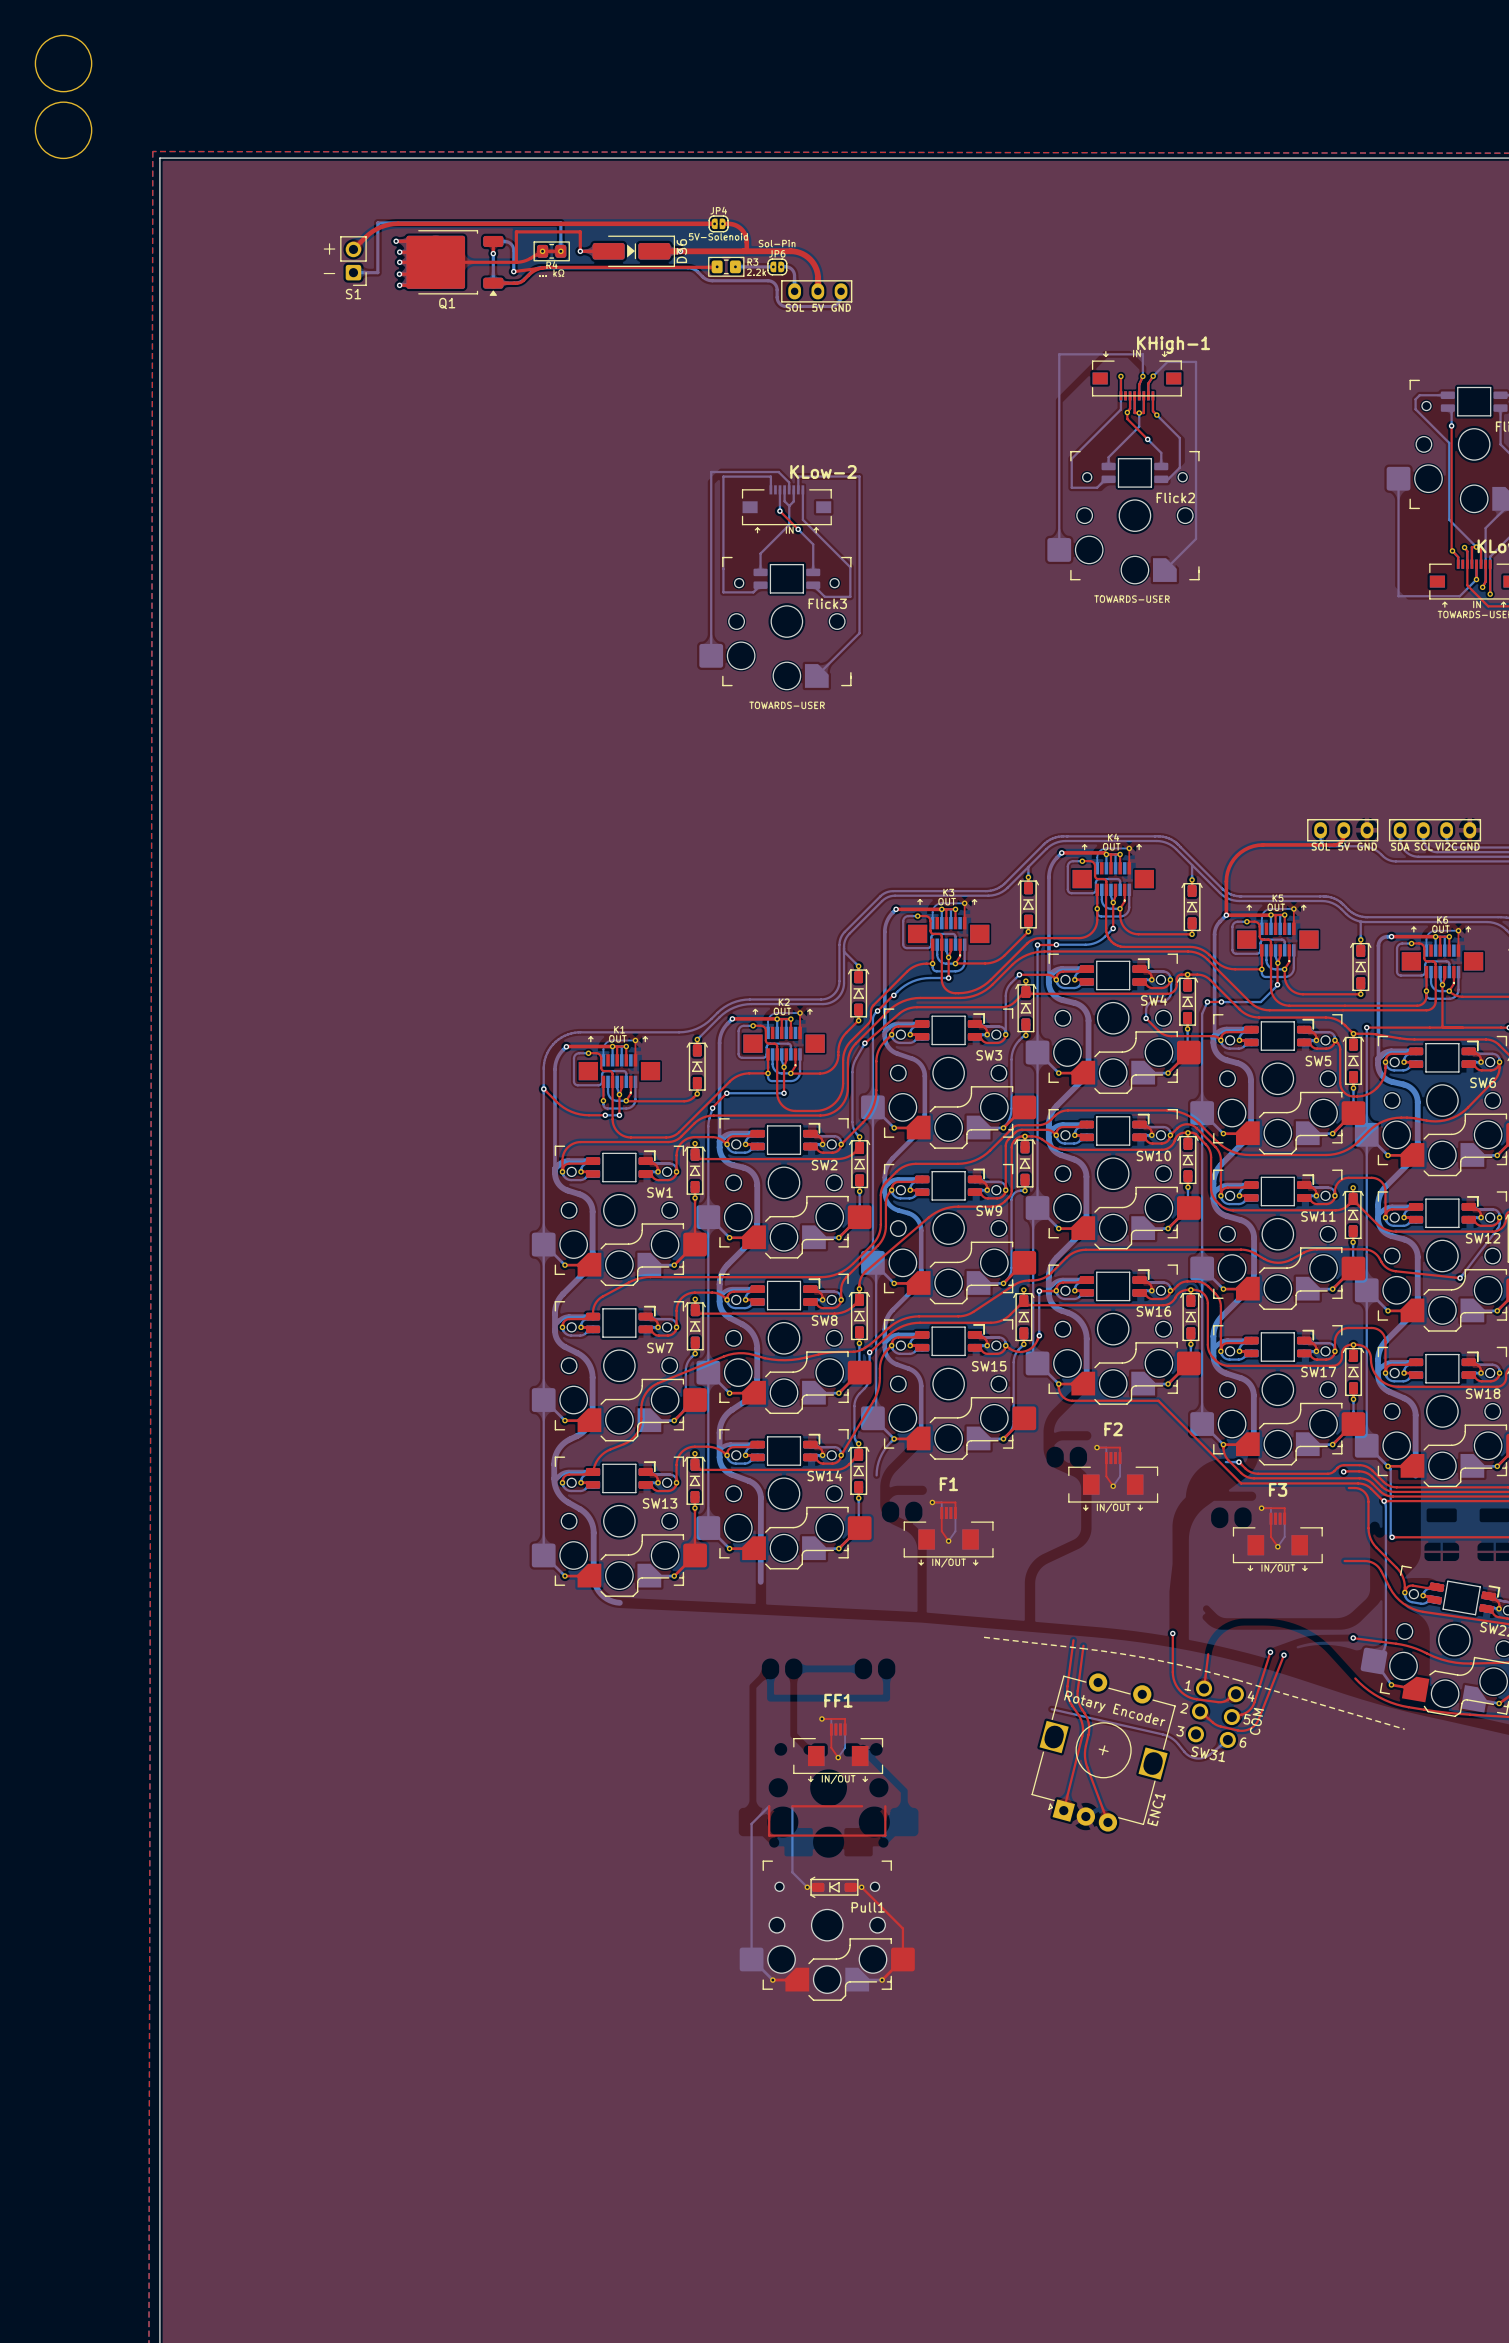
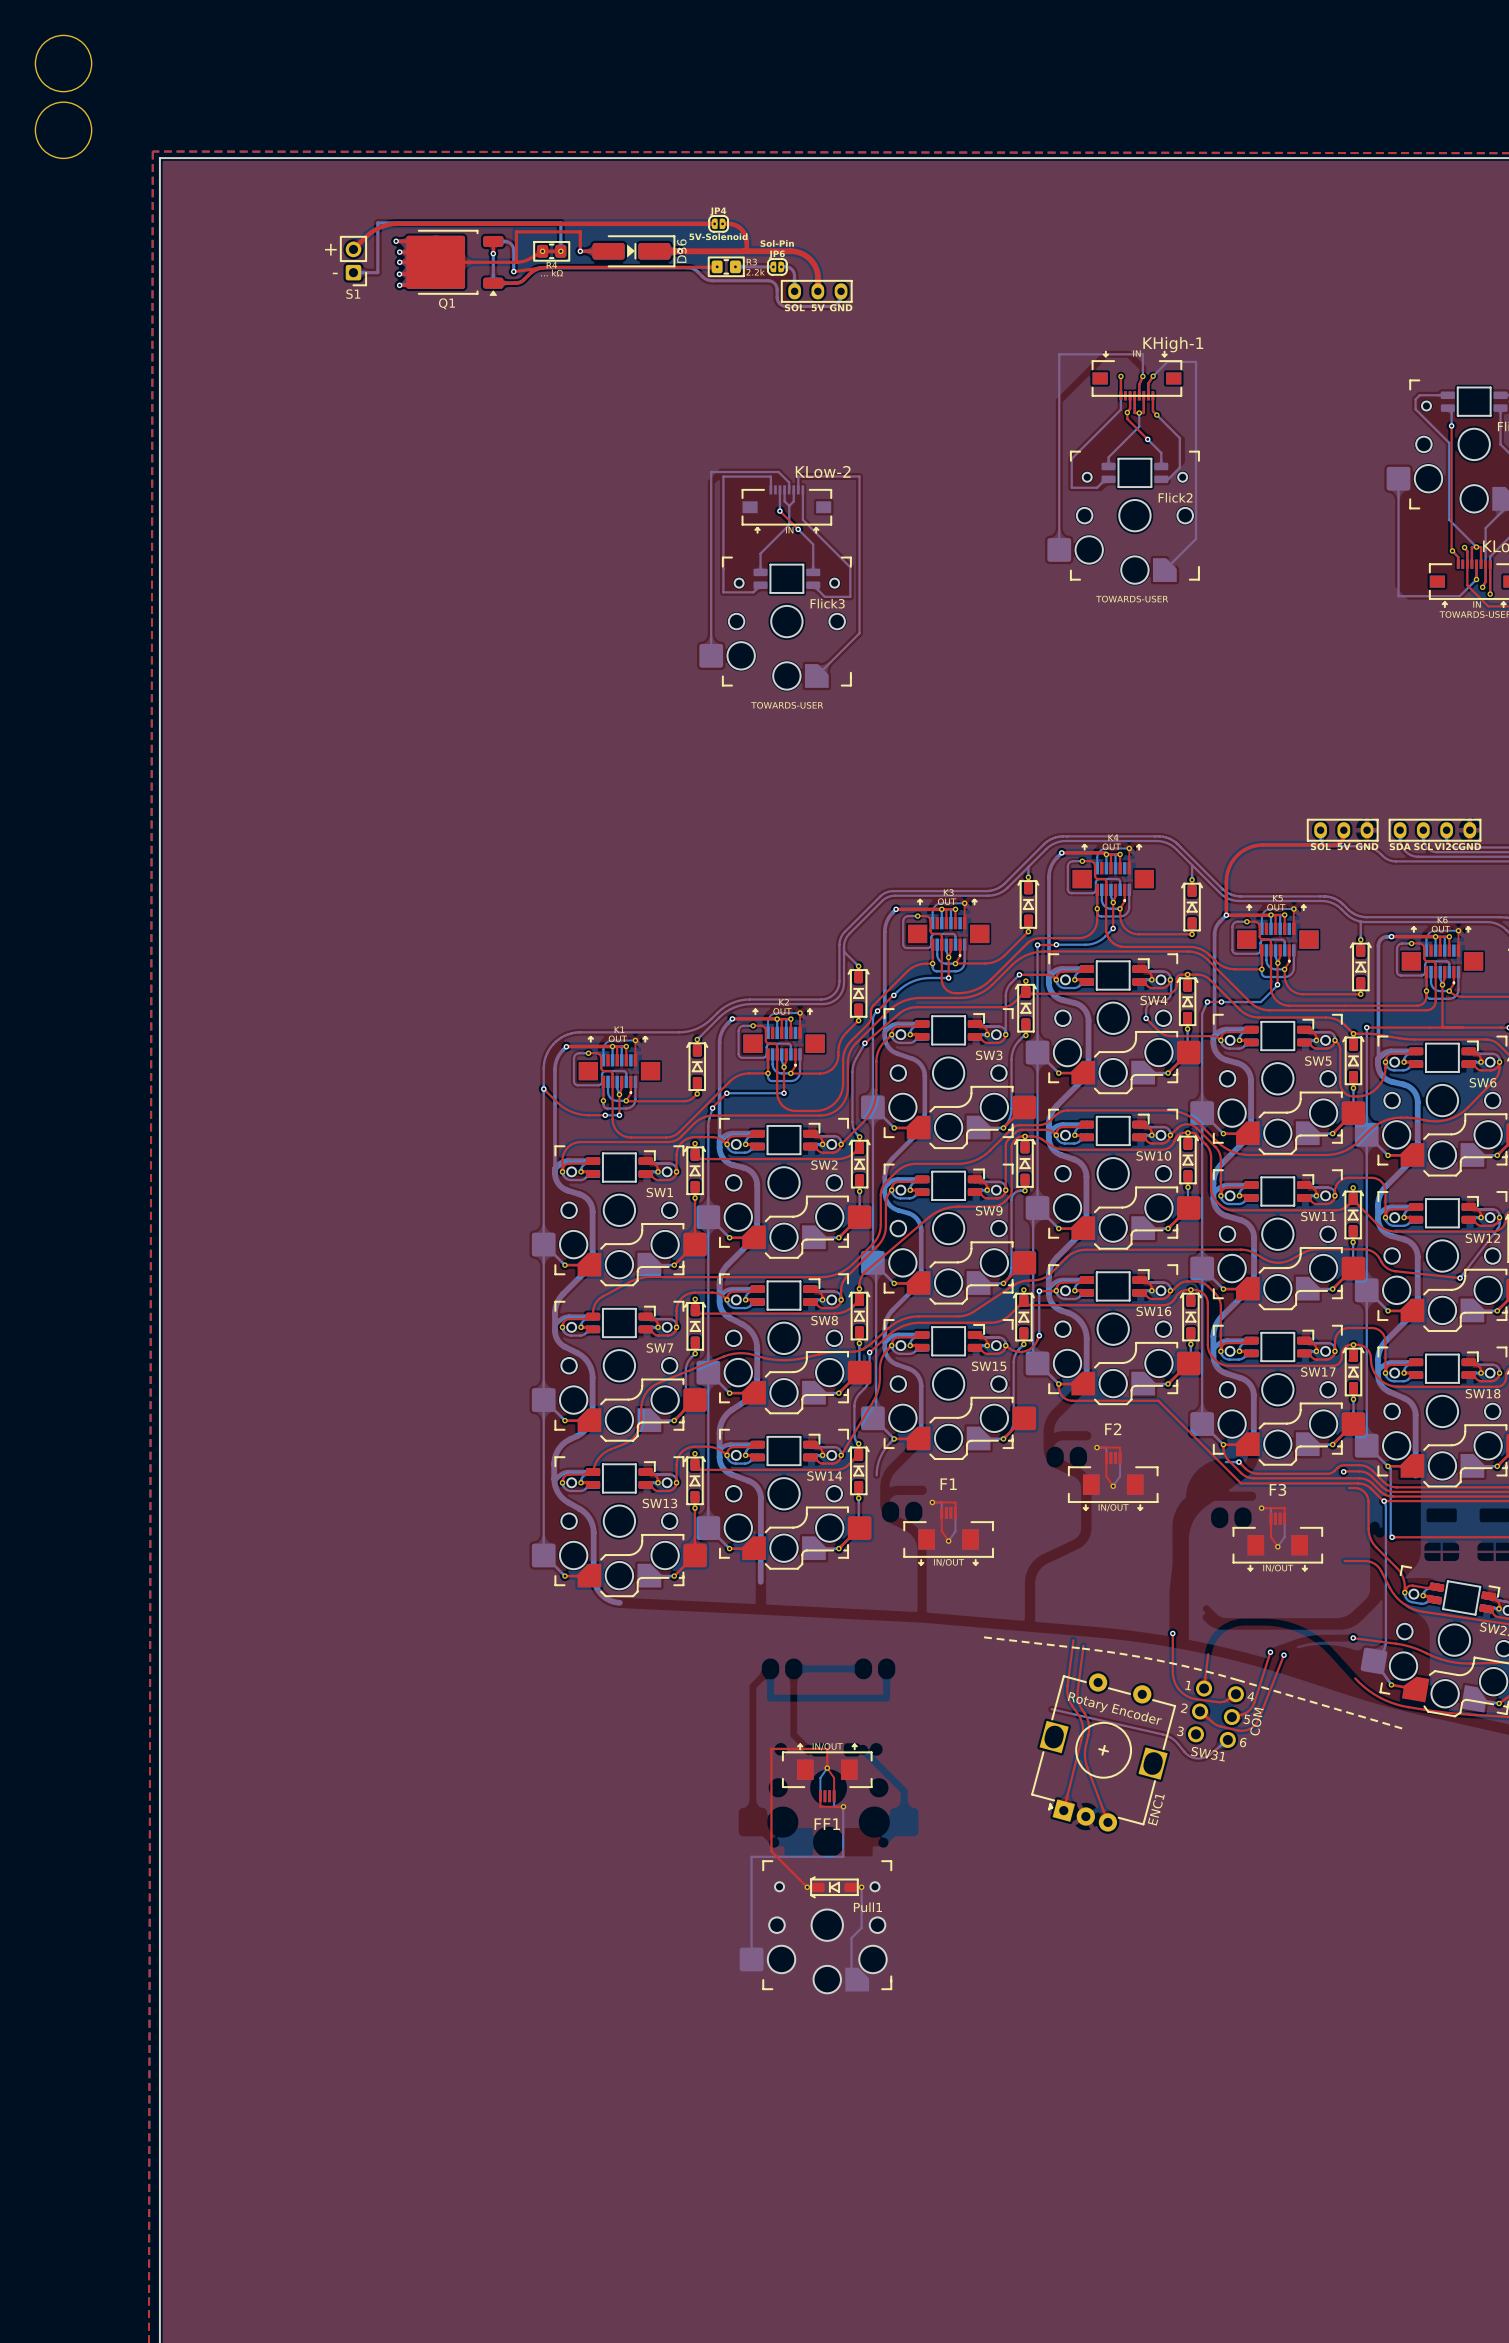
FF1 rotation: 0° (838, 1748) -> 180° (827, 1776)
top track: none -> (827, 1768) (827, 1748) (771, 1748) (771, 1851) (807, 1887)
top track: (769, 1806) (769, 1835) (885, 1835) (885, 1806) -> none
bottom track: (769, 1806) (751, 1823) (751, 1856) -> (843, 1806) (843, 1856) (751, 1856)
top track: (792, 1806) (862, 1806) -> none
bottom track: (792, 1806) (792, 1872) (807, 1887) -> none
Pull1 footprint: [739, 1860, 915, 2001] -> [739, 1860, 892, 1994]
top track: (861, 1887) (902, 1928) (902, 1959) -> none
bottom track: none -> (861, 1887) (861, 1927) (851, 1938) (851, 1973) (857, 1979)

